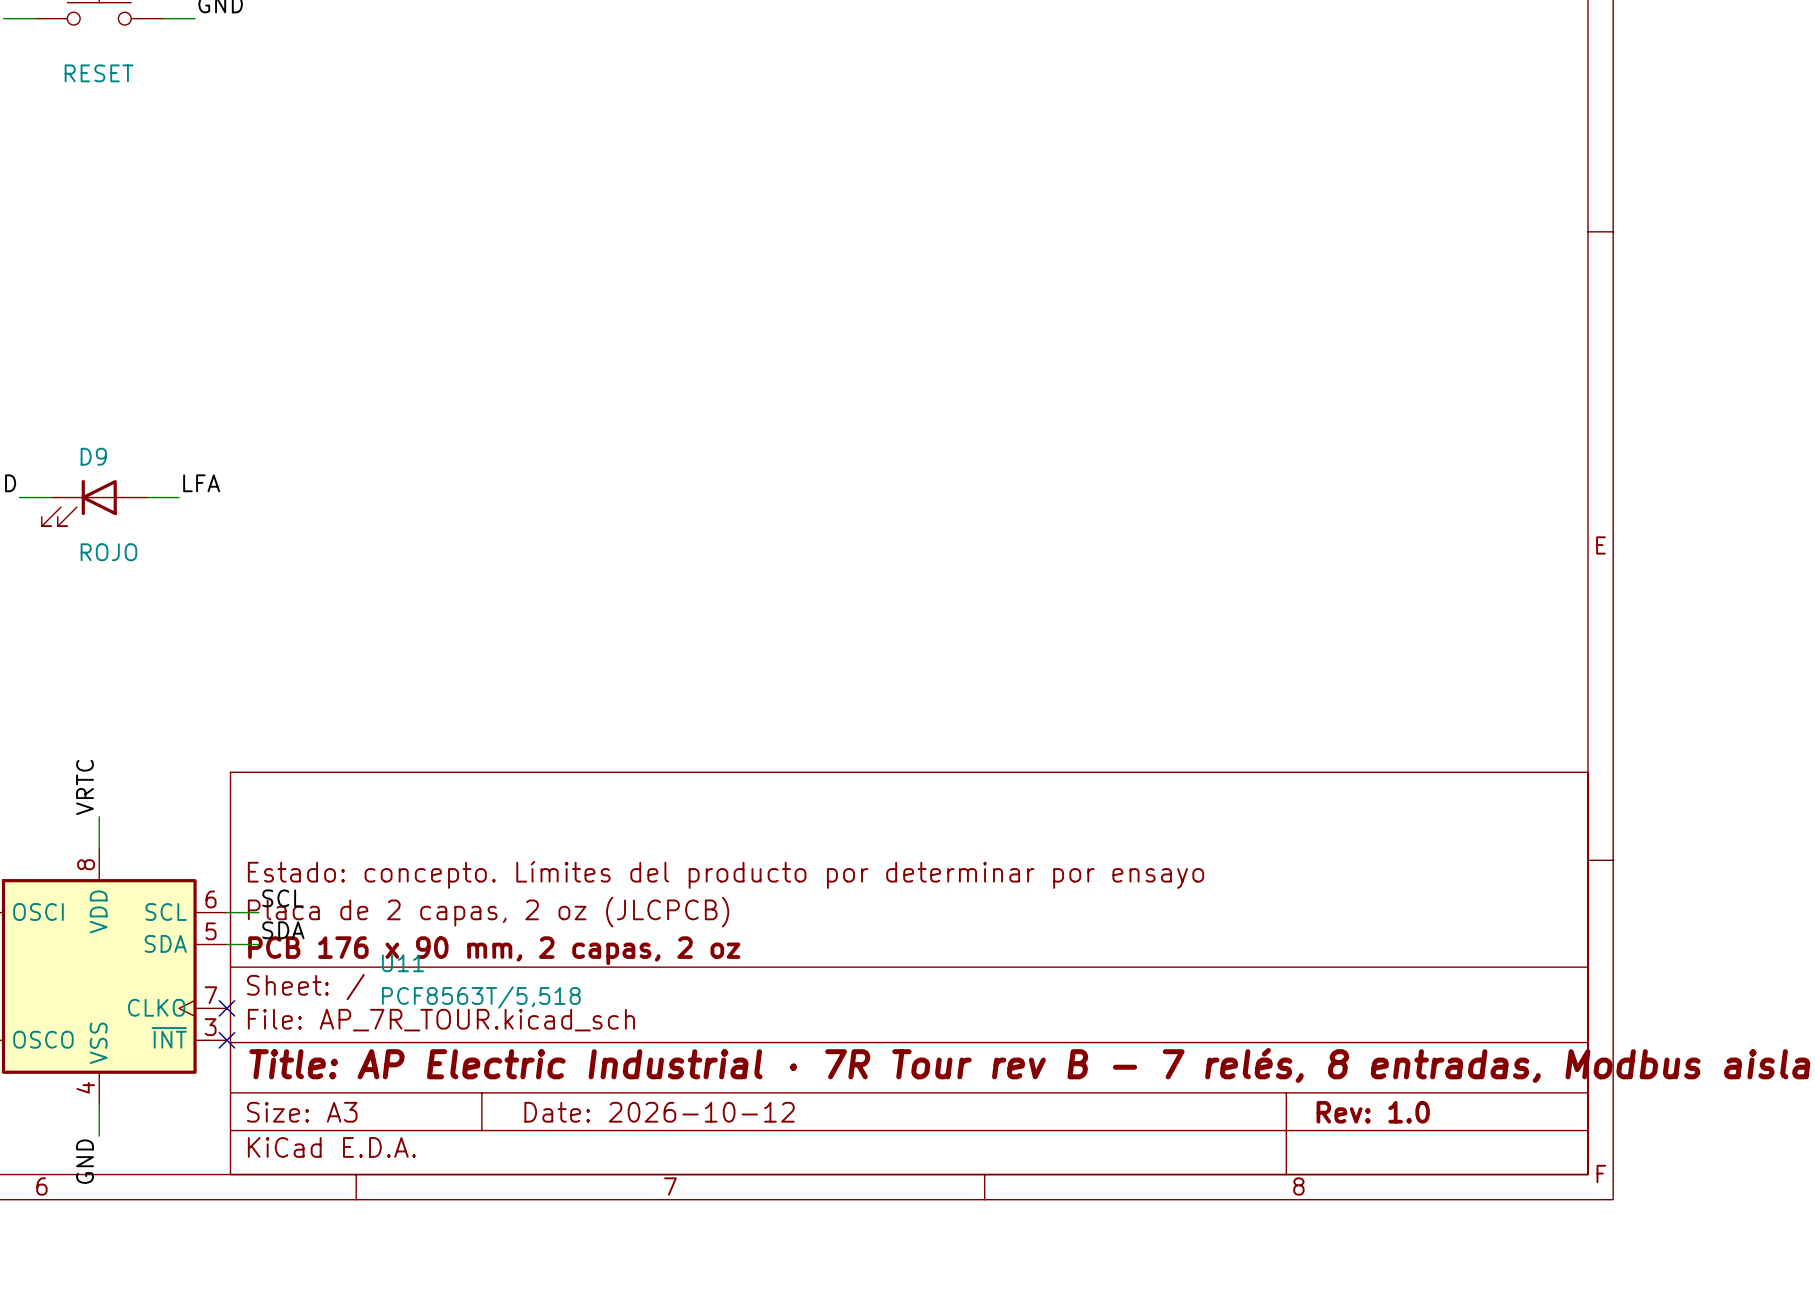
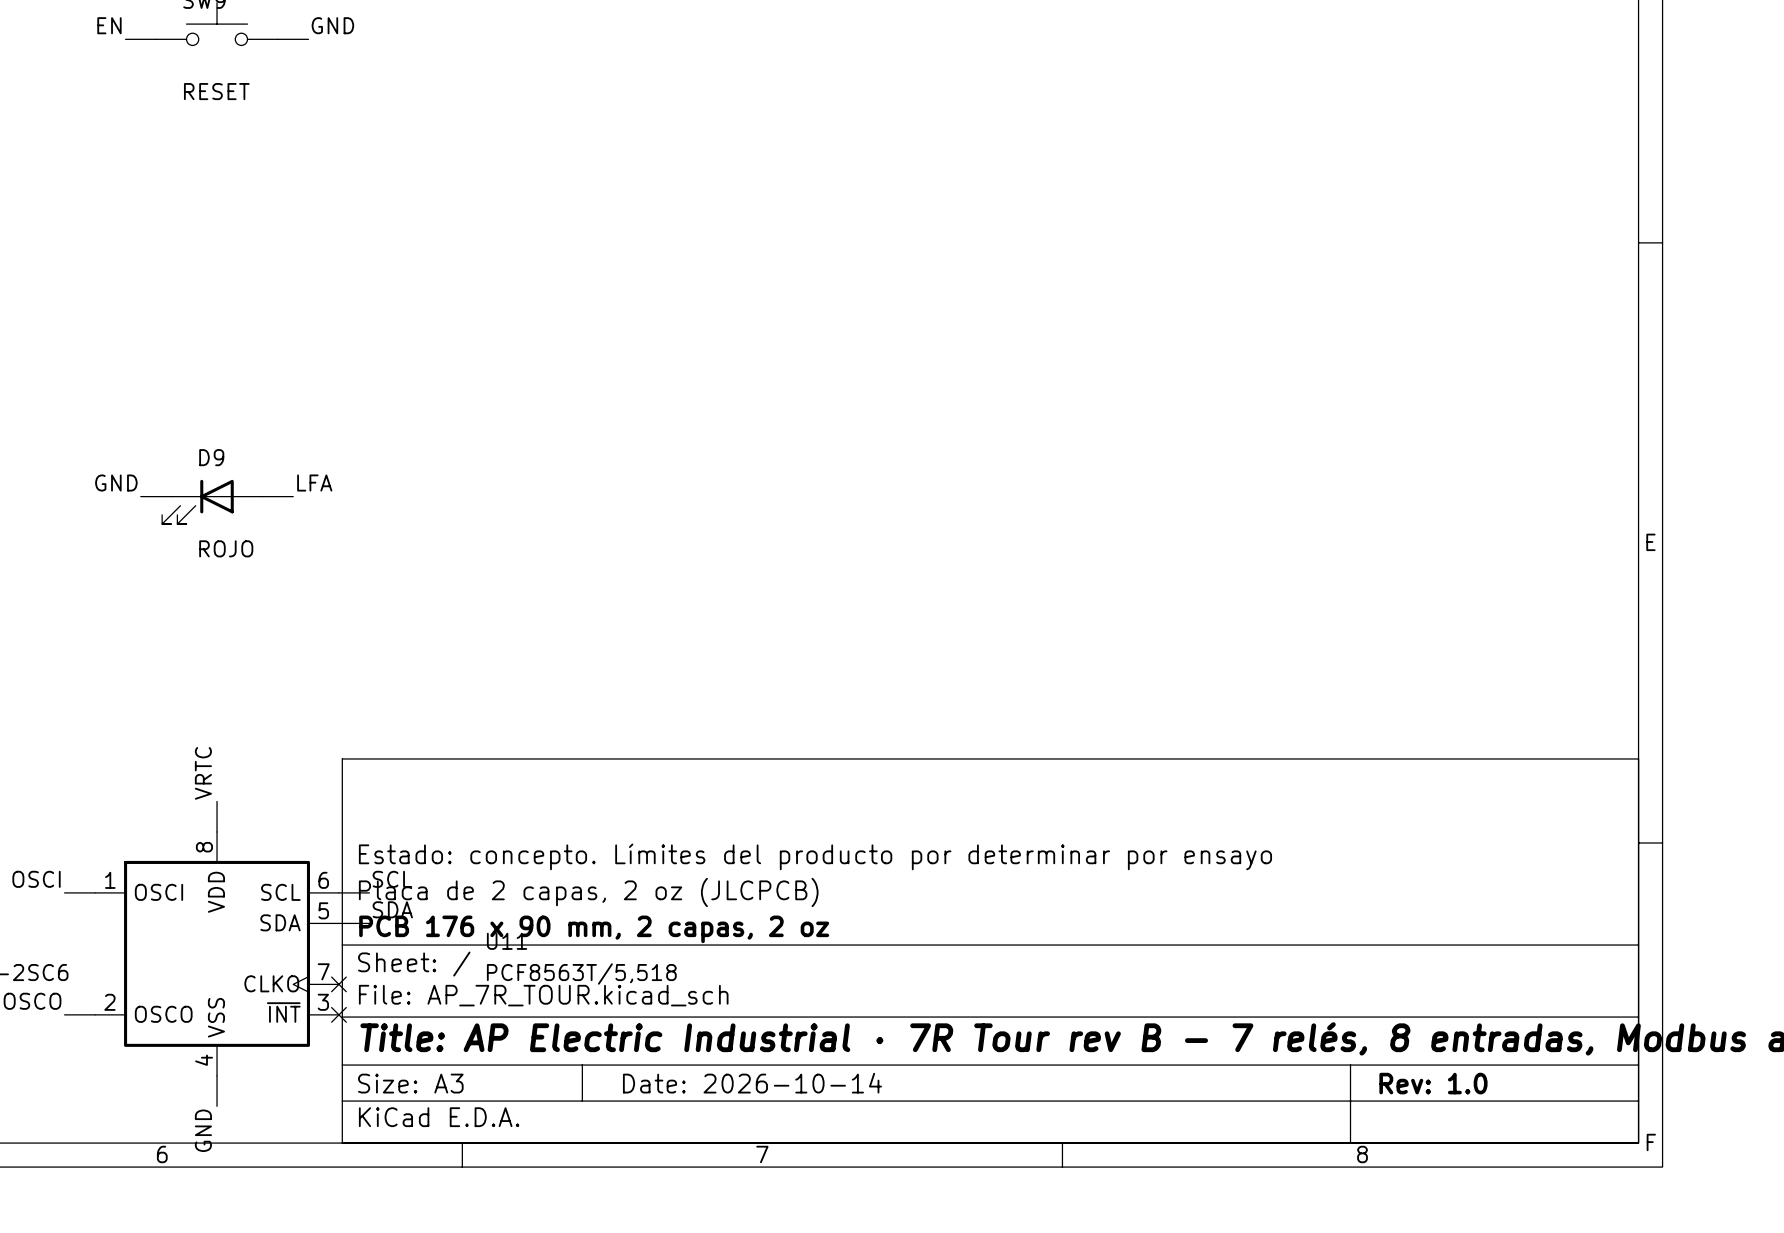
title block: Date: 2026-10-12 (659, 1112) -> Date: 2026-10-14 (752, 1083)

